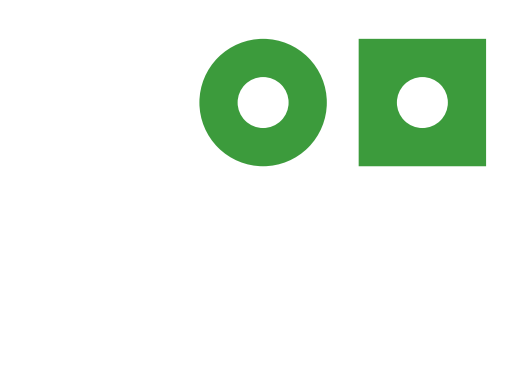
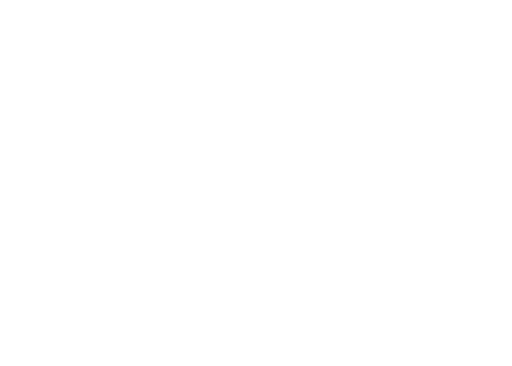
part: (342, 102) -> none

